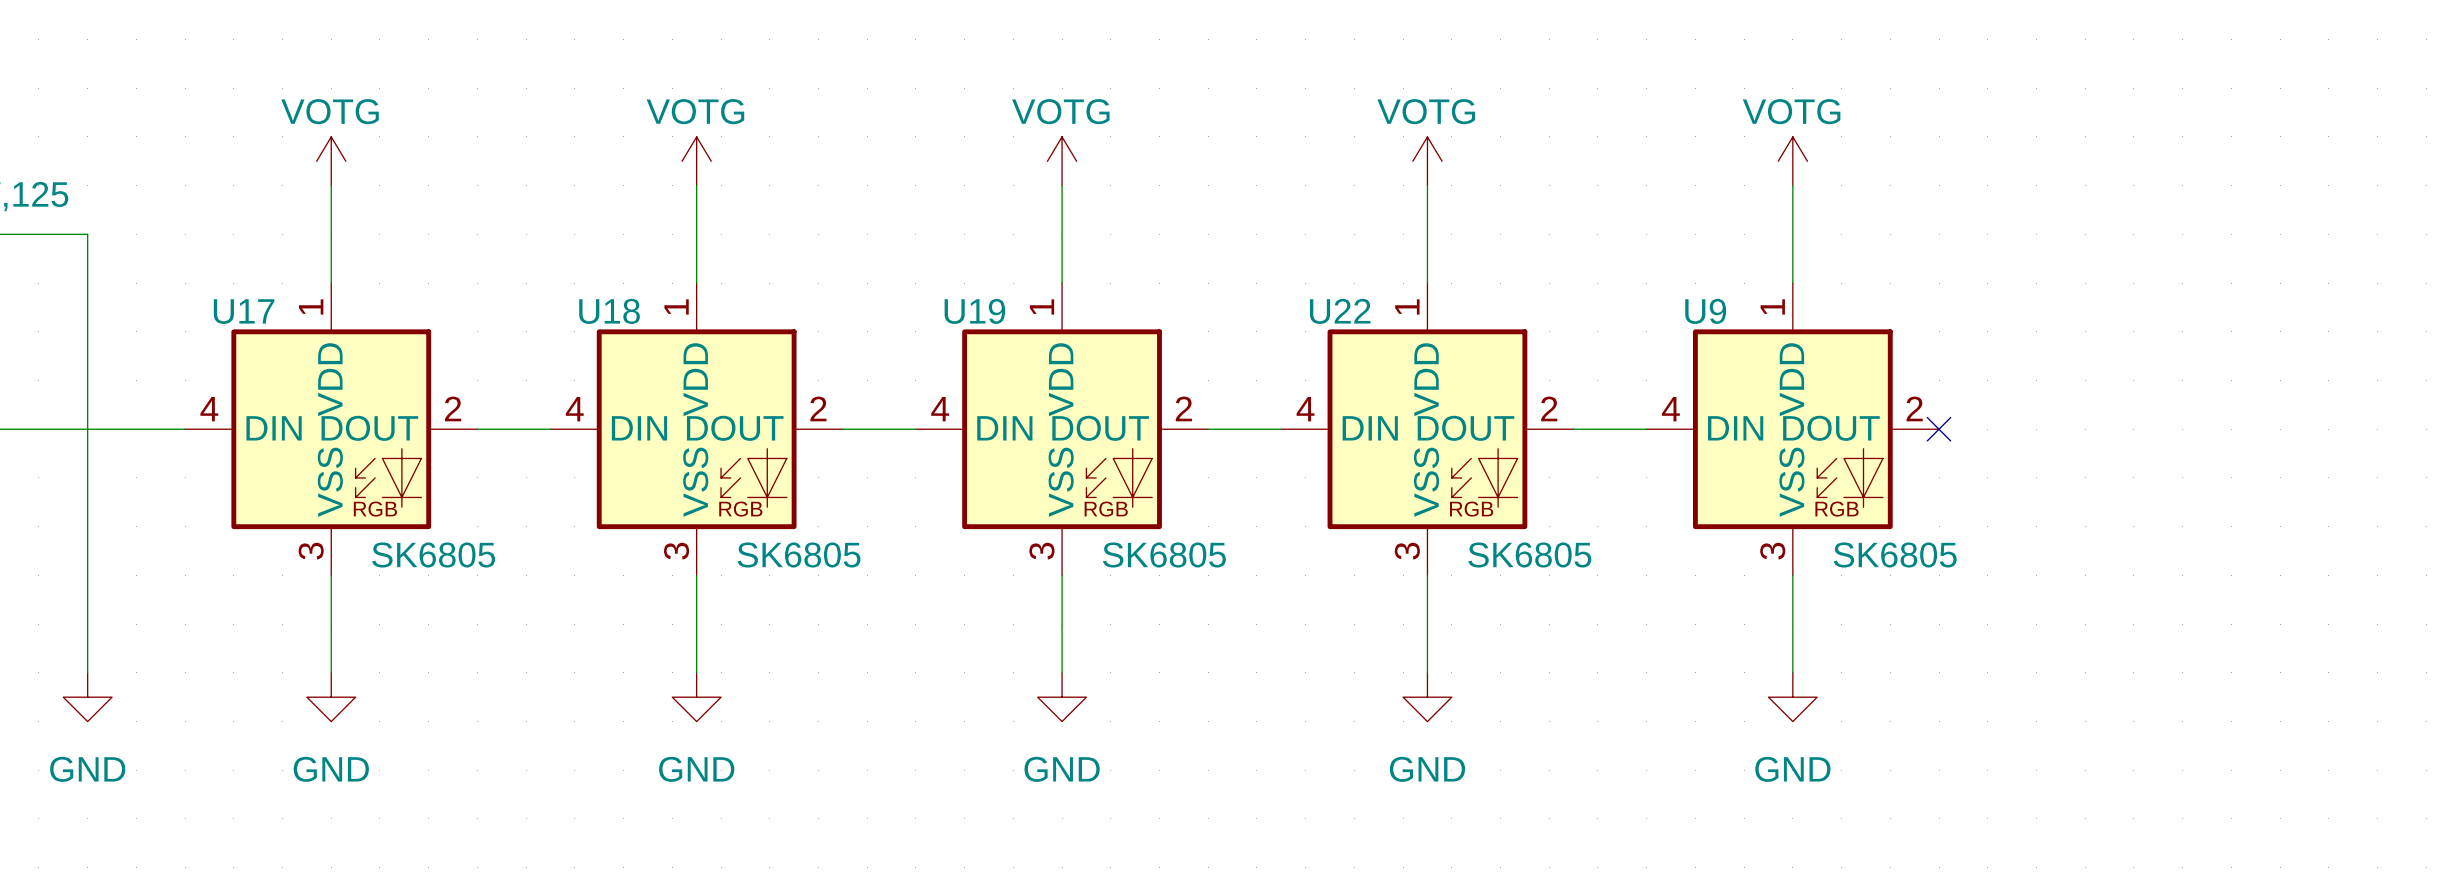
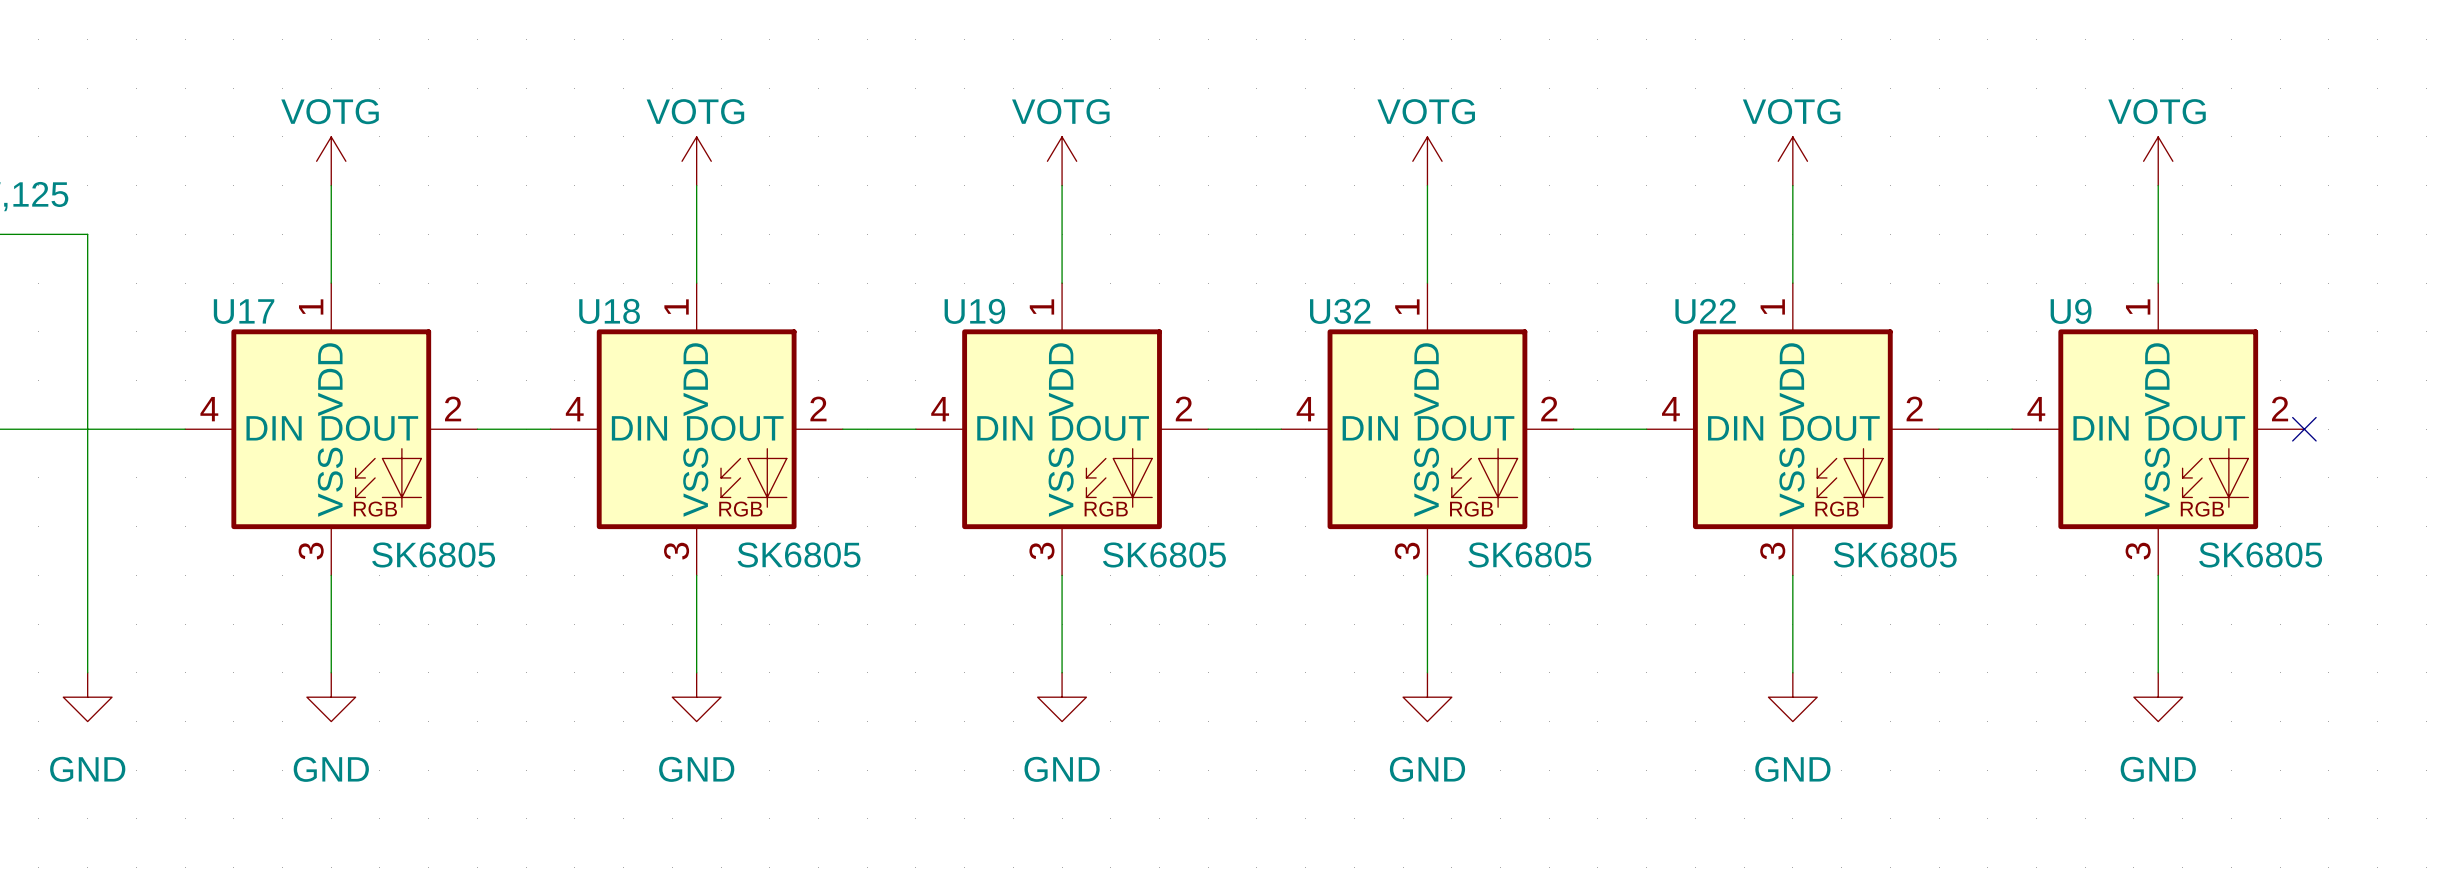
power symbol: none -> VOTG (2158, 161)
wire: none -> (2158, 185) (2158, 283)
U22 name: U22 (1340, 311) -> U32 (1340, 311)
U9 name: U9 (1705, 311) -> U22 (1705, 311)
wire: none -> (1939, 429) (2012, 429)
no-connect mark: (1939, 429) -> none
U9: none -> SK6805 (2158, 429)
no-connect mark: none -> (2304, 429)
wire: none -> (2158, 575) (2158, 672)
power symbol: none -> GND (2158, 697)

